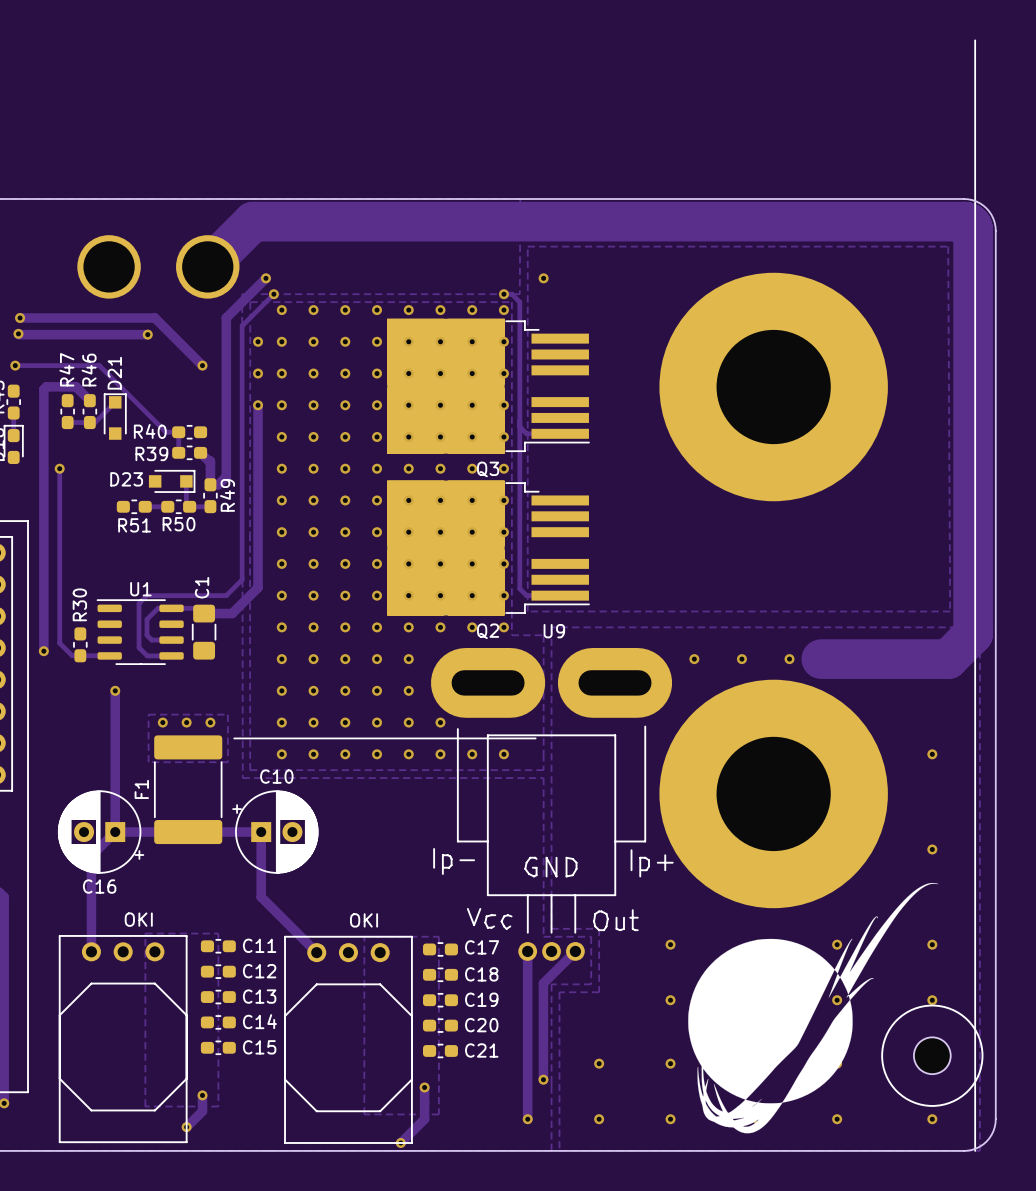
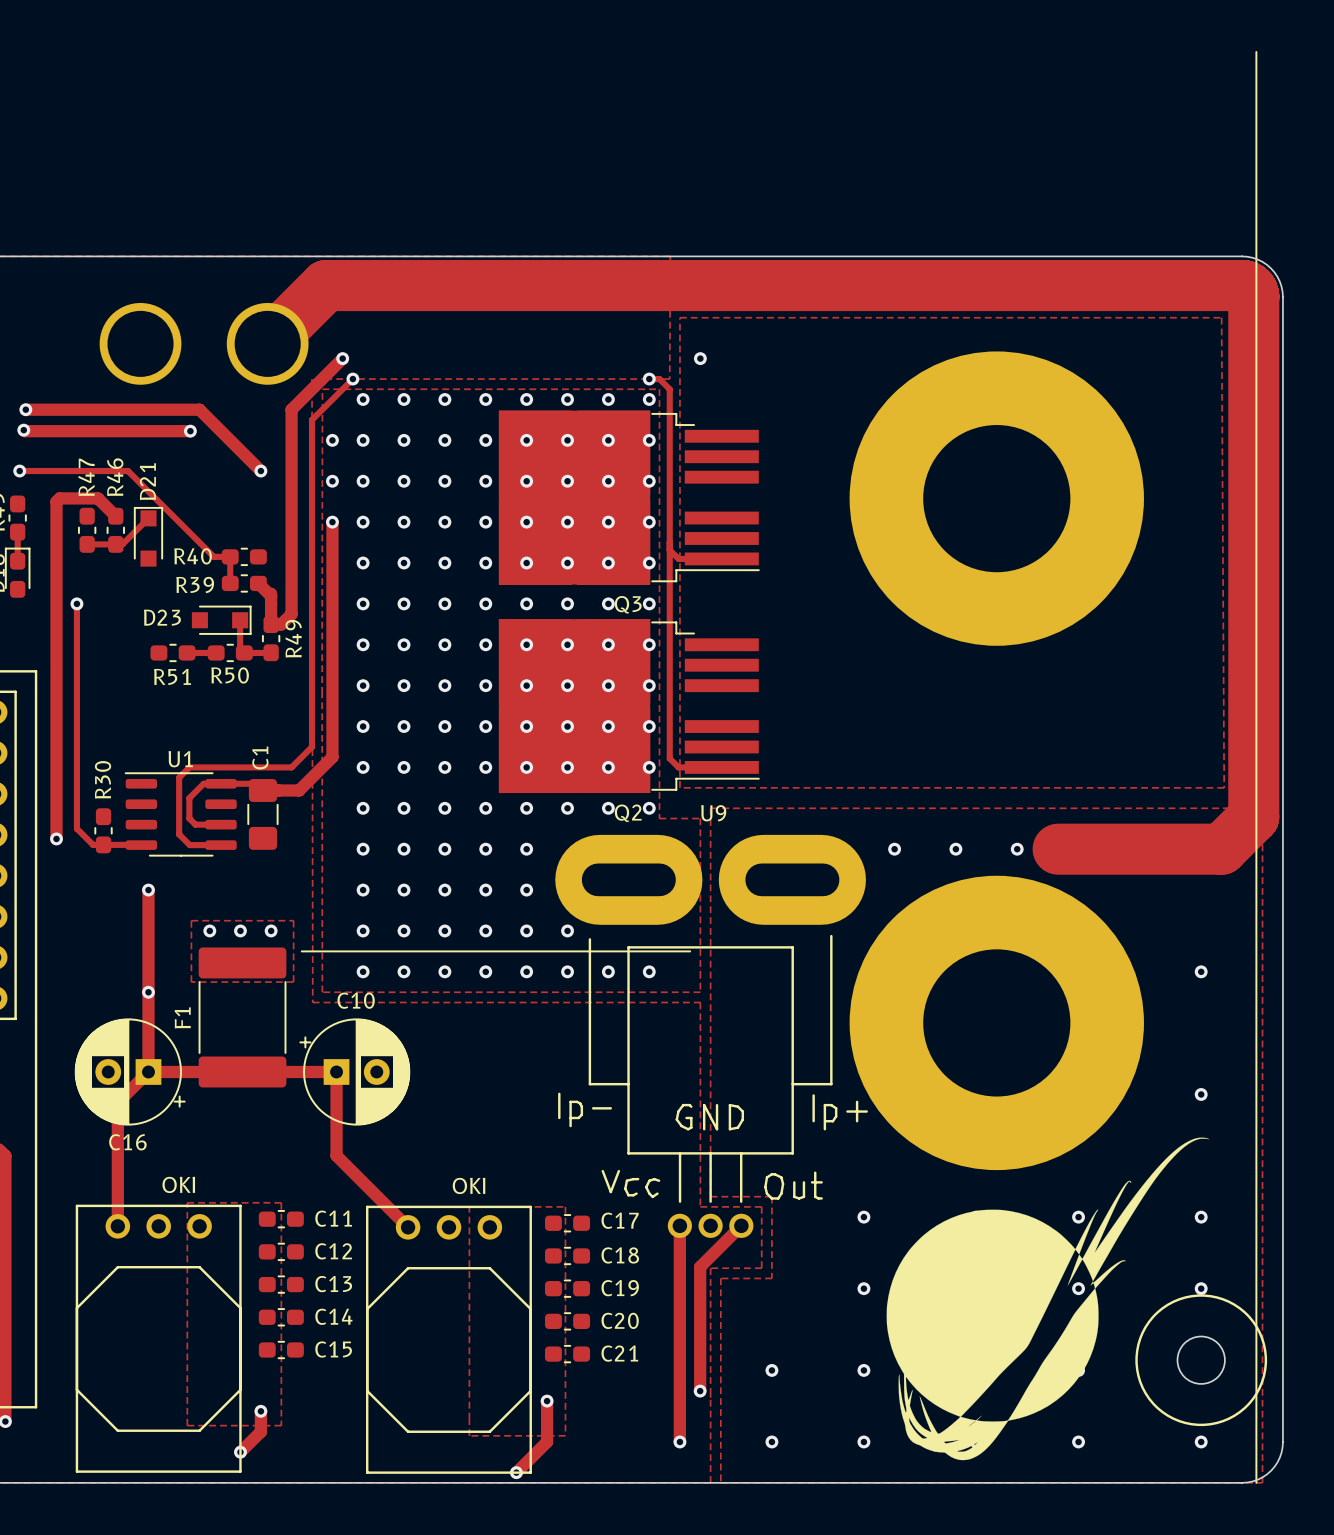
via: none -> (148, 992)

